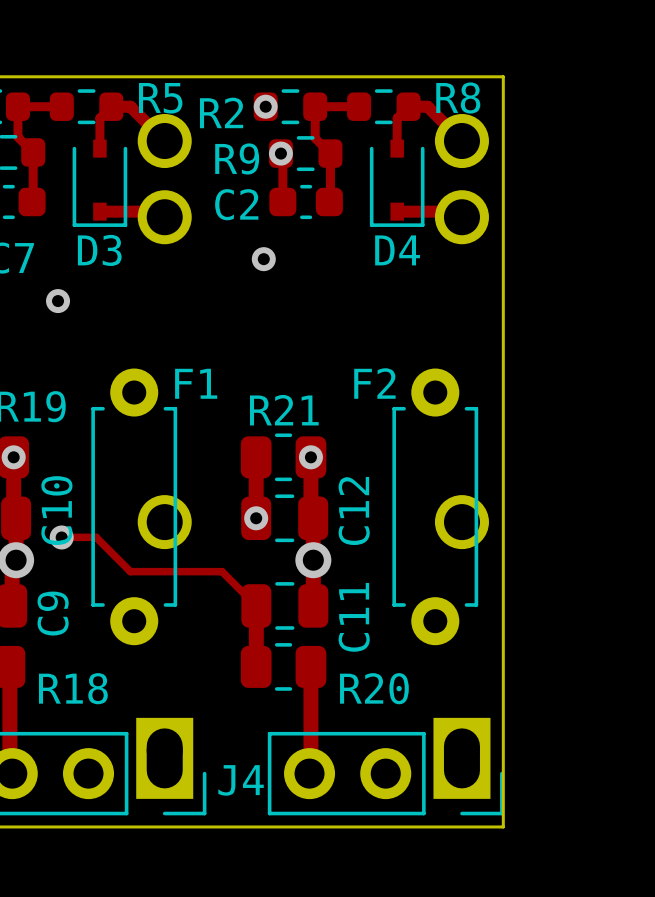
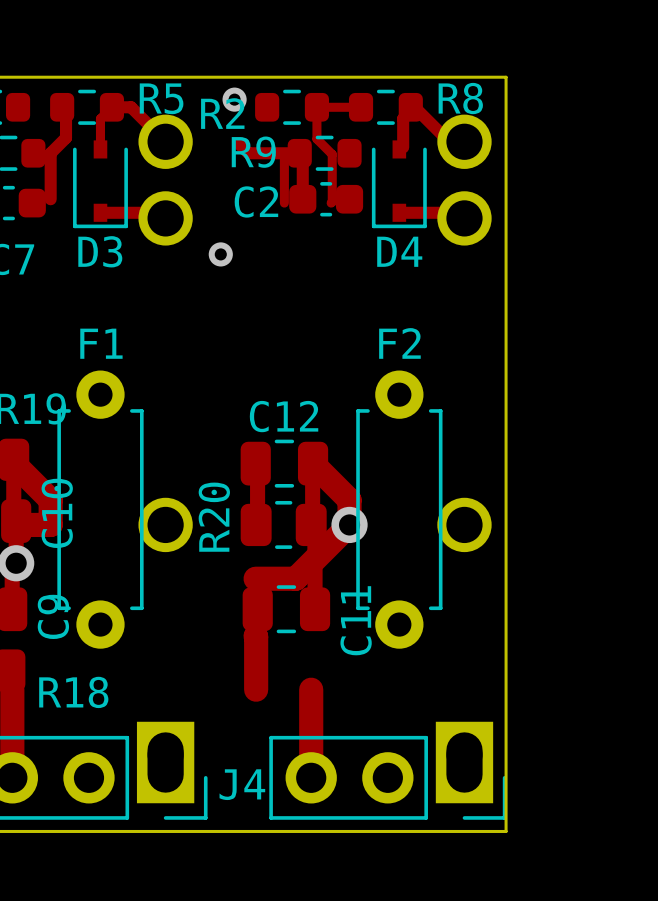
track: (61, 106) (17, 106) (17, 137) (33, 152) (32, 201) -> none
track: none -> (66, 107) (66, 137) (50, 153) (50, 199)
via position: (265, 106) -> (234, 99)
track: none -> (449, 141) (414, 107) (403, 118) (403, 147)
track: (461, 141) (427, 106) (408, 106) (397, 118) (397, 148) -> none
track: none -> (239, 144) (248, 153) (299, 153) (302, 156) (302, 199)
via: (280, 153) -> none
R9 position: (305, 153) -> (324, 153)
R9 name position: R9 (237, 158) -> R9 (253, 152)
C2 position: (306, 201) -> (326, 199)
via position: (263, 259) -> (220, 254)
via: (58, 301) -> none
F1 name position: F1 (196, 383) -> F1 (101, 343)
F2 name position: F2 (374, 383) -> F2 (399, 343)
via: (13, 457) -> none
R21: (283, 457) -> none
via: (310, 457) -> none
track: none -> (14, 463) (50, 500) (50, 524) (13, 524)
track: none -> (313, 463) (349, 500) (349, 524) (295, 578) (255, 578)
F1 position: (134, 506) -> (100, 509)
F2 position: (435, 506) -> (399, 509)
C12 name rotation: 0° (354, 511) -> 90° clockwise (284, 416)
via: (256, 518) -> none
C12 position: (284, 518) -> (284, 463)
track: (61, 537) (96, 537) (130, 571) (222, 571) (256, 605) (256, 666) -> none
via: (61, 537) -> none
via position: (313, 560) -> (349, 524)
track: none -> (255, 636) (256, 689)
track: (9, 666) (9, 771) (12, 773) -> (12, 689) (12, 777)
R20 position: (283, 666) -> (283, 524)
track: (310, 666) (309, 773) -> (311, 689) (311, 777)
R20 name rotation: 0° (374, 688) -> 90° counterclockwise (214, 517)
R20 name position: R20 (374, 688) -> R20 (214, 517)

